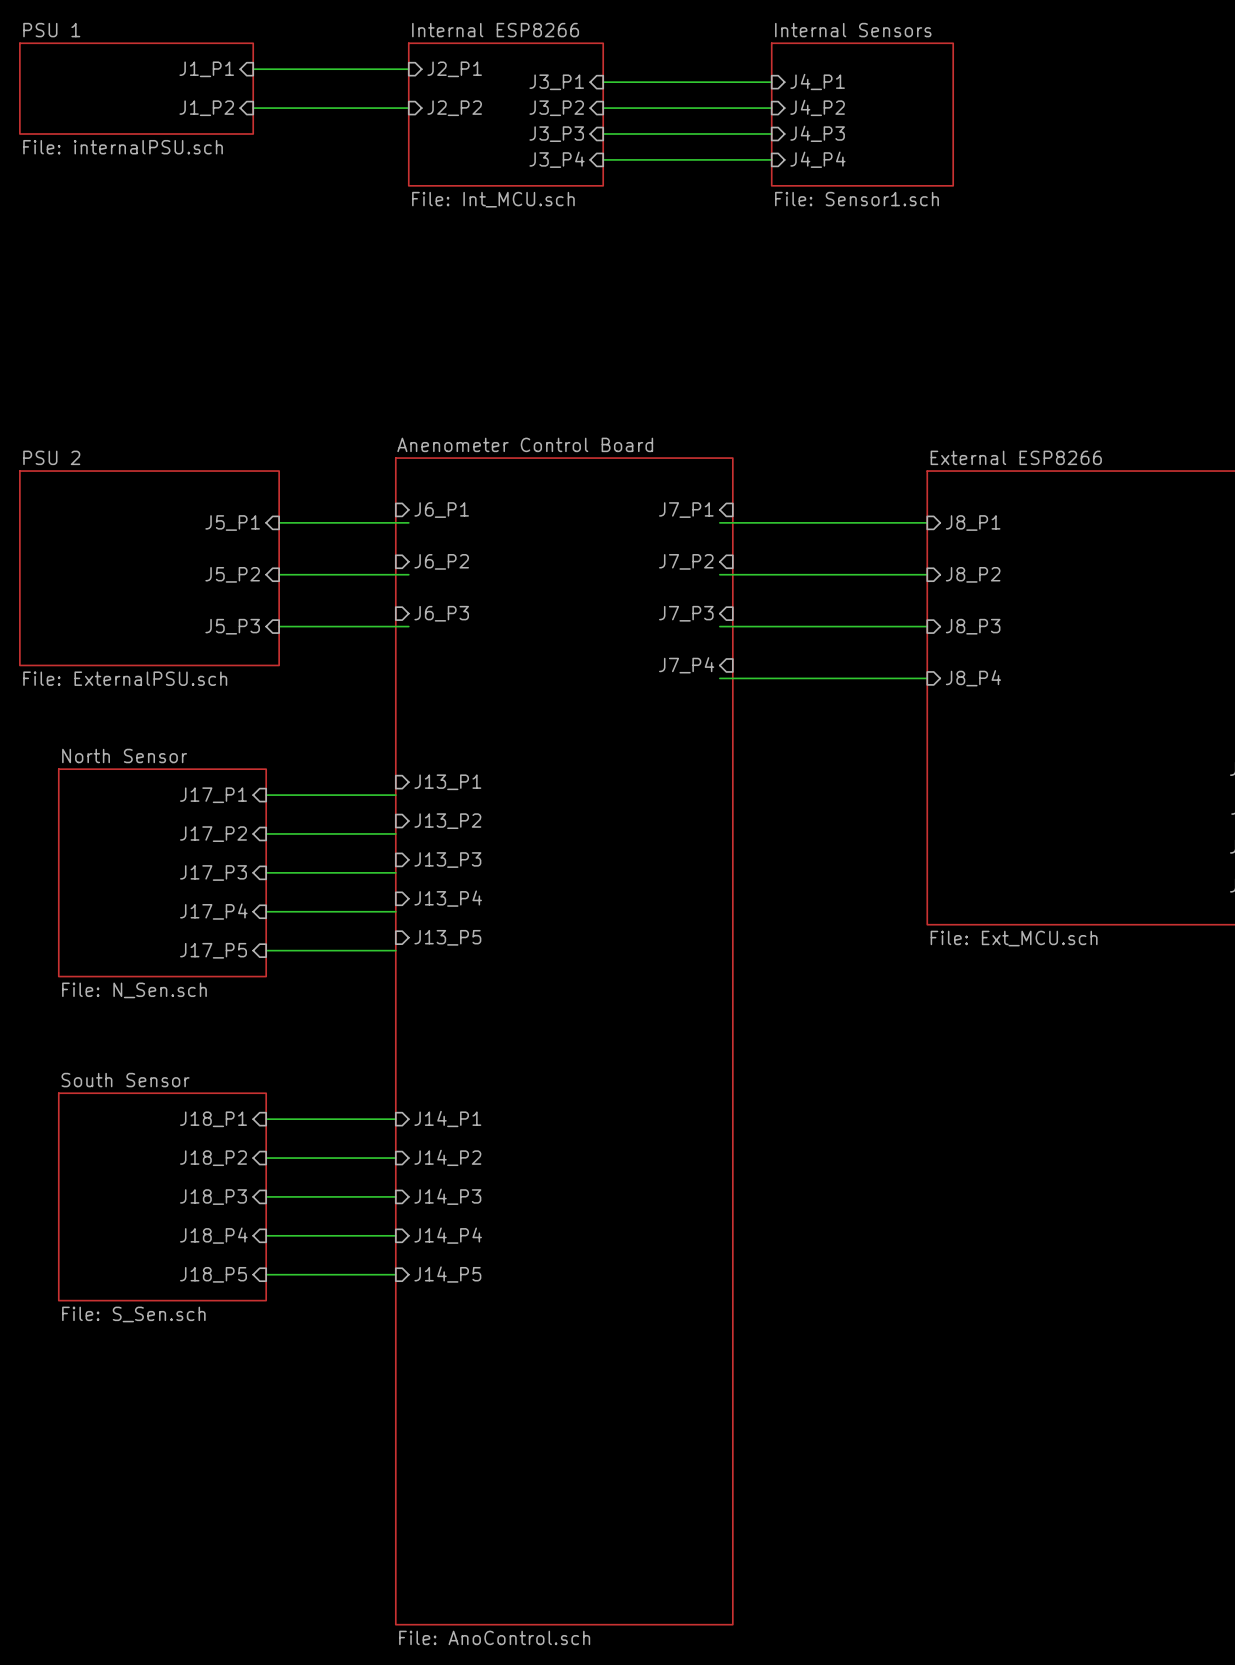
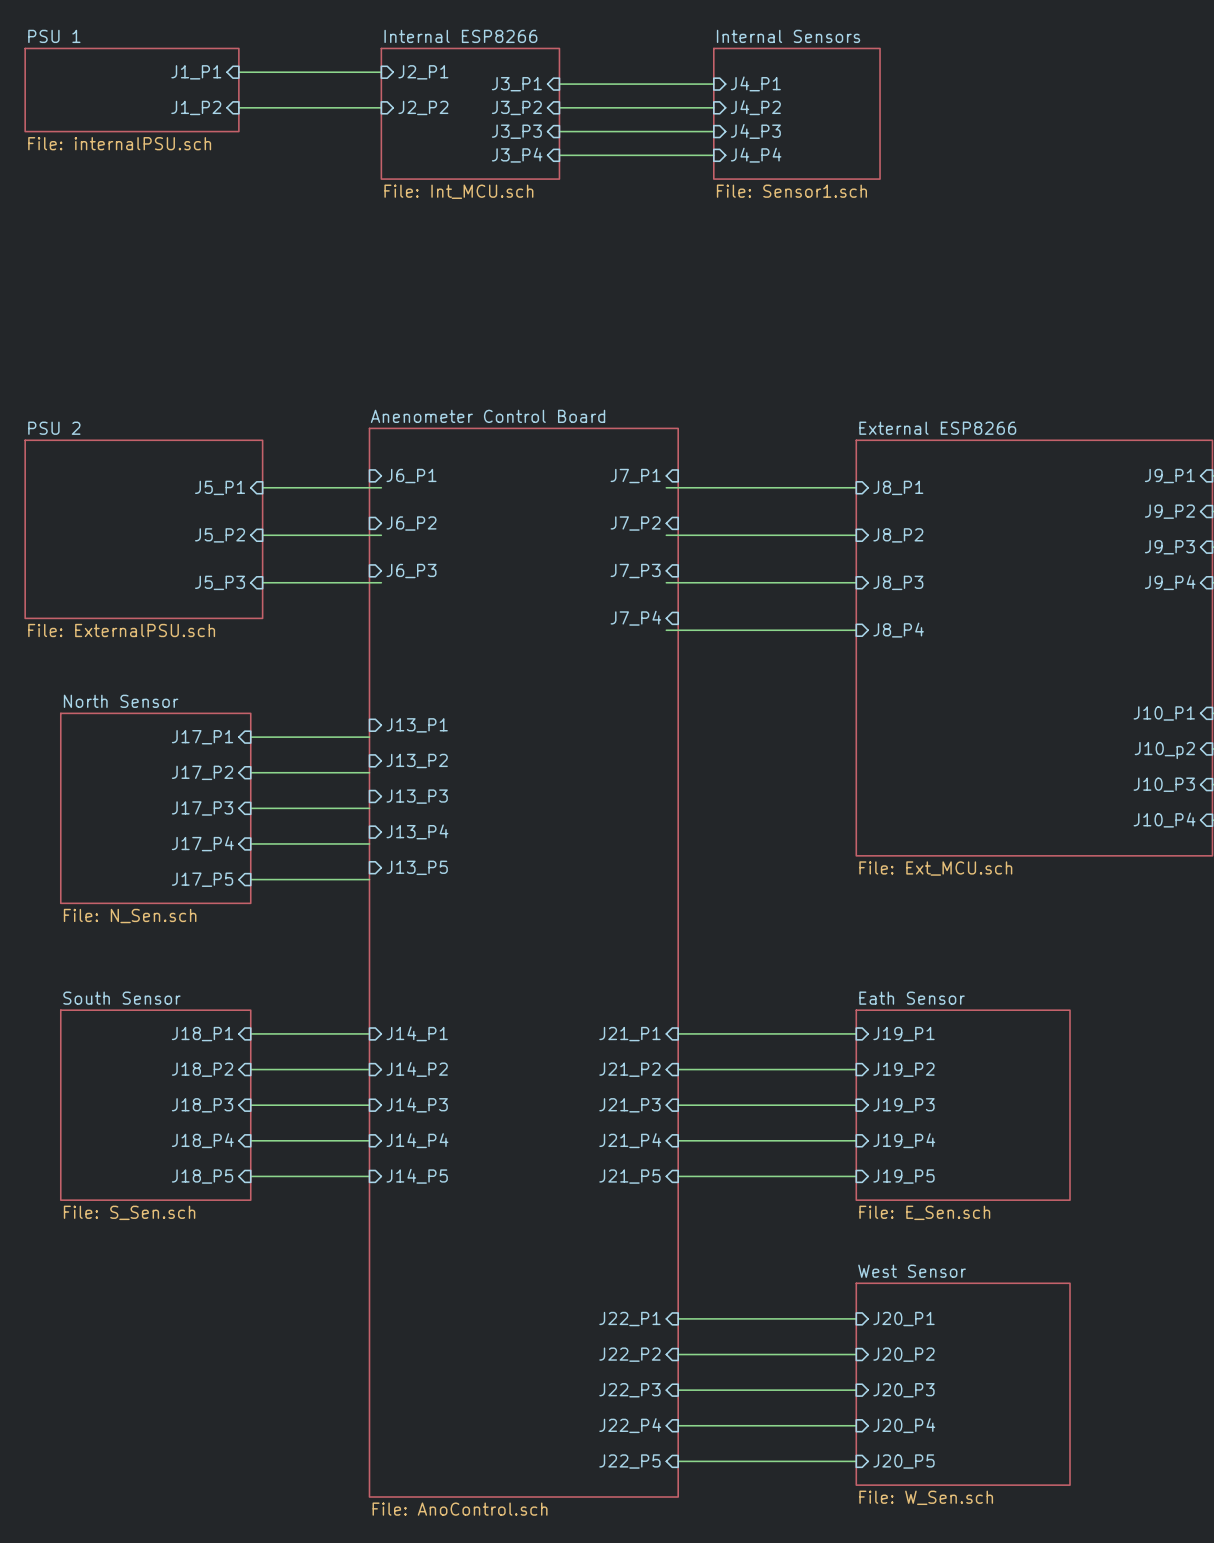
sheet pin: none -> J21_P1 (629, 1034)
wire: none -> (678, 1033) (856, 1033)
sheet pin: none -> J19_P1 (903, 1034)
sheet pin: none -> J21_P2 (629, 1069)
wire: none -> (678, 1069) (856, 1069)
sheet pin: none -> J19_P2 (903, 1069)
wire: none -> (678, 1105) (856, 1105)
sheet Eath Sensor: none -> File: E_Sen.sch (963, 1105)
sheet pin: none -> J21_P3 (629, 1105)
sheet pin: none -> J19_P3 (903, 1105)
sheet pin: none -> J21_P4 (630, 1140)
wire: none -> (678, 1140) (856, 1140)
sheet pin: none -> J19_P4 (904, 1140)
sheet pin: none -> J21_P5 (629, 1176)
wire: none -> (678, 1176) (856, 1176)
sheet pin: none -> J19_P5 (903, 1176)
sheet pin: none -> J22_P1 (629, 1319)
wire: none -> (678, 1318) (856, 1318)
sheet pin: none -> J20_P1 (903, 1319)
sheet pin: none -> J22_P2 (629, 1354)
wire: none -> (678, 1354) (856, 1354)
sheet pin: none -> J20_P2 (903, 1354)
sheet West Sensor: none -> File: W_Sen.sch (963, 1384)
sheet pin: none -> J22_P3 (629, 1390)
wire: none -> (678, 1390) (856, 1390)
sheet pin: none -> J20_P3 (903, 1390)
sheet pin: none -> J22_P4 (630, 1425)
wire: none -> (678, 1425) (856, 1425)
sheet pin: none -> J20_P4 (904, 1425)
sheet pin: none -> J22_P5 (629, 1461)
wire: none -> (678, 1461) (856, 1461)
sheet pin: none -> J20_P5 (903, 1461)

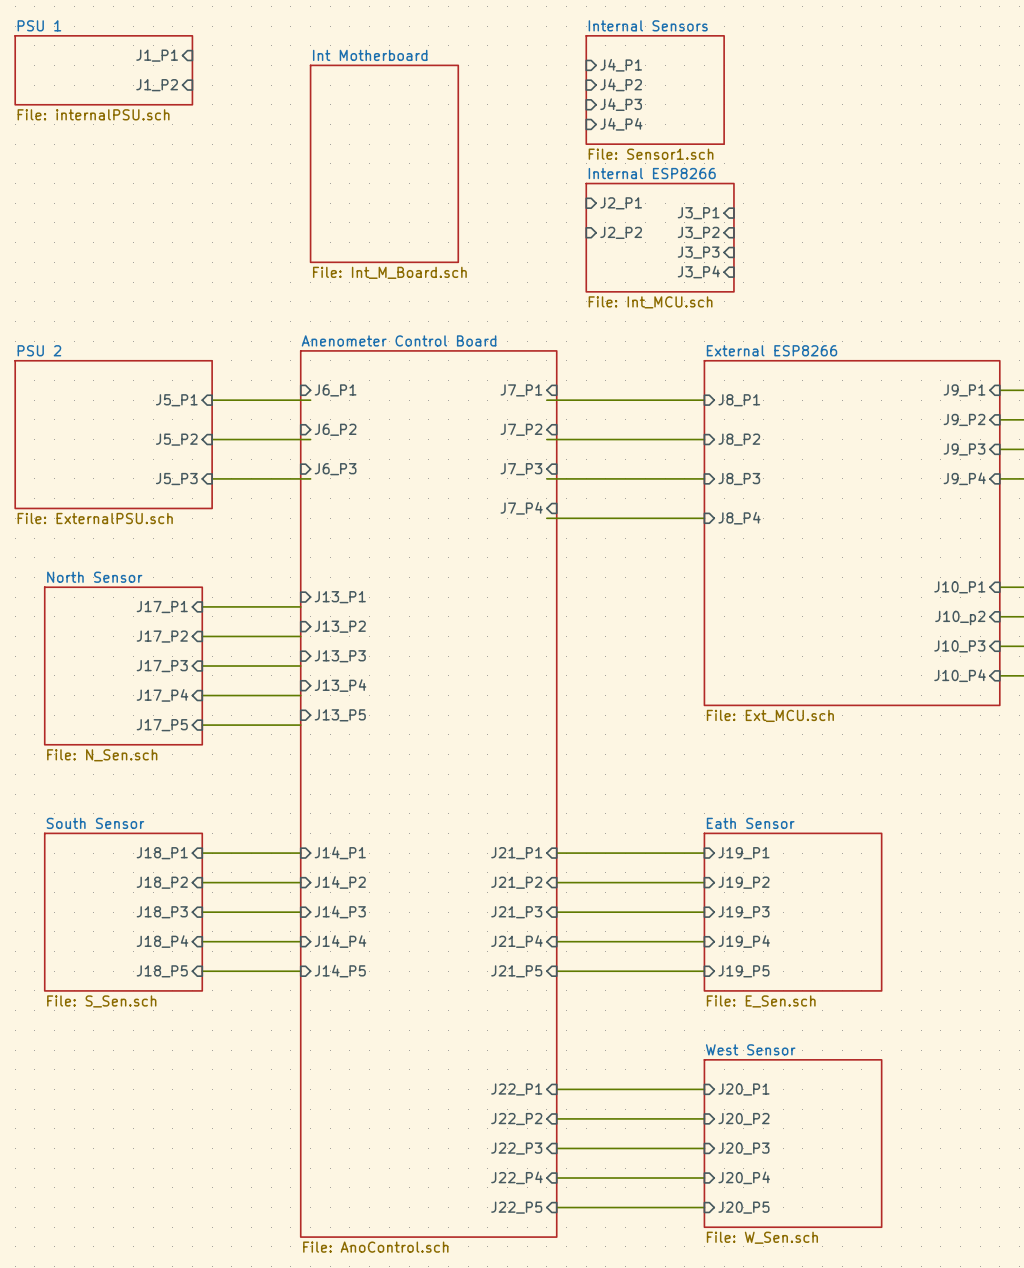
wire: (238, 72) (381, 72) -> none
sheet pin: J2_P1 (423, 72) -> none
sheet pin: J3_P1 (516, 84) -> none
wire: (559, 84) (713, 84) -> none
wire: (238, 107) (381, 107) -> none
sheet pin: J2_P2 (423, 107) -> none
sheet pin: J3_P2 (516, 107) -> none
wire: (559, 107) (713, 107) -> none
sheet Internal ESP8266 position: (470, 113) -> (660, 237)
sheet pin: J3_P3 (516, 131) -> none
wire: (559, 131) (713, 131) -> none
sheet pin: J3_P4 (517, 155) -> none
wire: (559, 155) (713, 155) -> none
sheet Int Motherboard: none -> File: Int_M_Board.sch (384, 163)
sheet pin: none -> J2_P1 (621, 203)
sheet pin: none -> J3_P1 (698, 213)
sheet pin: none -> J2_P2 (621, 232)
sheet pin: none -> J3_P2 (698, 232)
sheet pin: none -> J3_P3 (698, 252)
sheet pin: none -> J3_P4 (698, 272)

